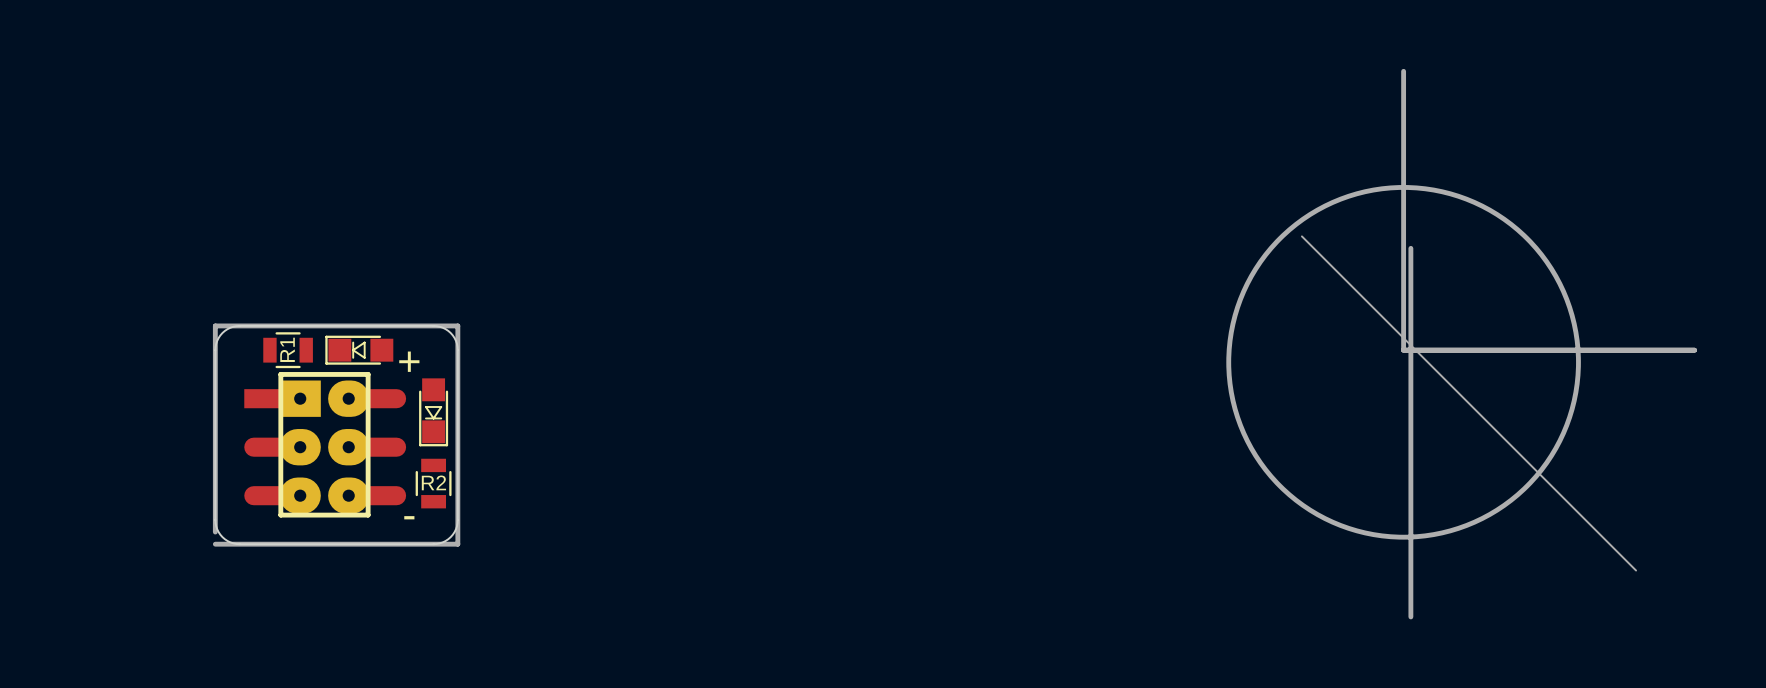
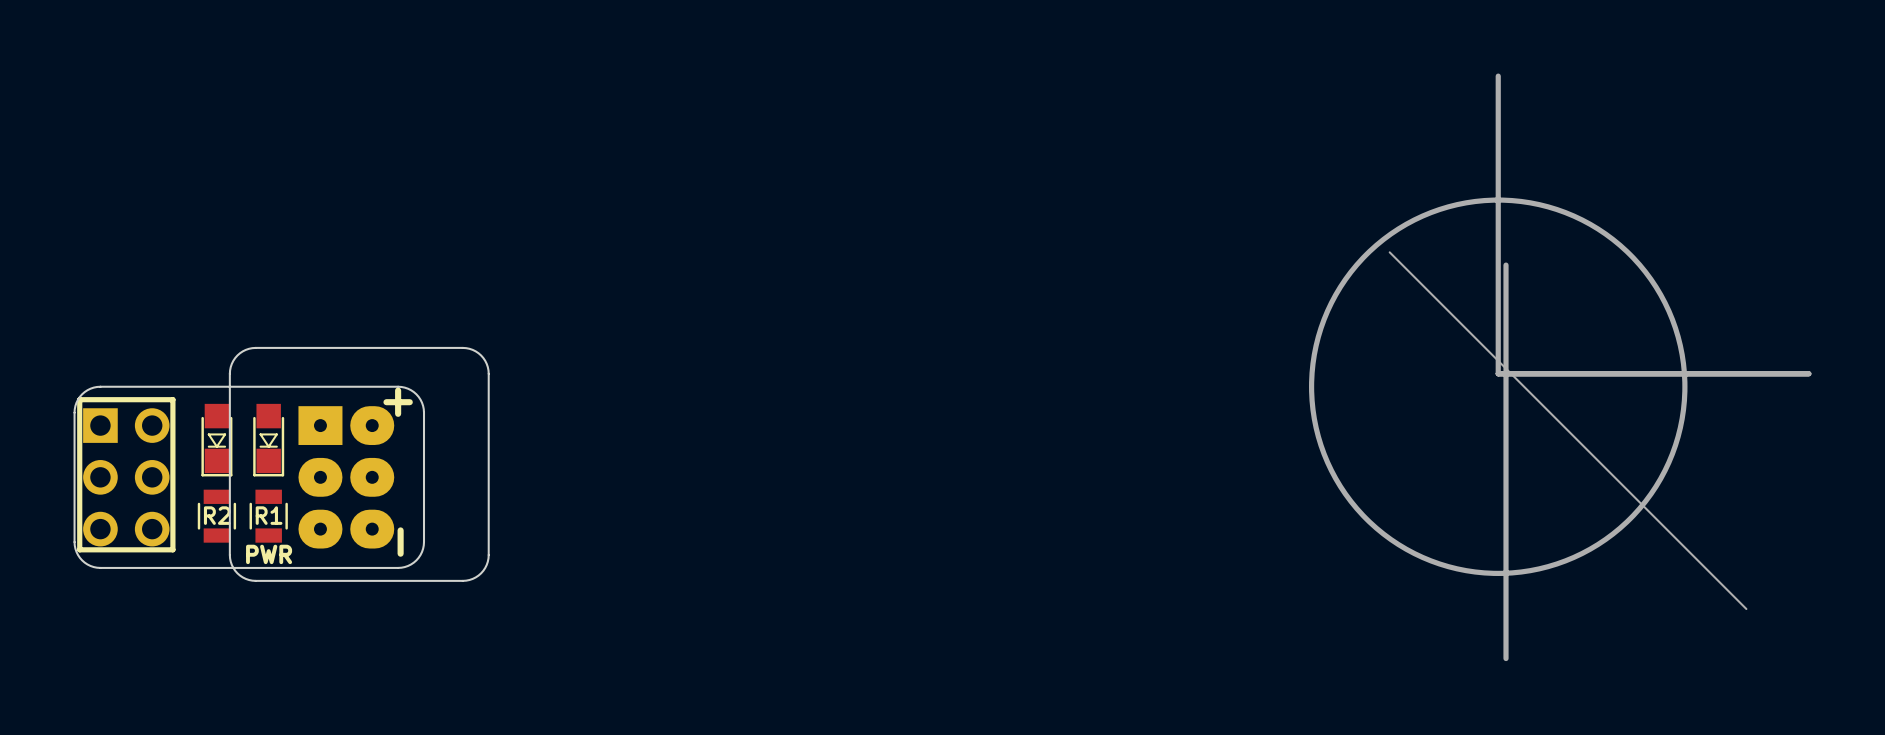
R1 rotation: 0° (288, 350) -> 90° clockwise (268, 516)
R1 position: (288, 350) -> (268, 516)
part: (359, 350) -> none
text position: + (409, 361) -> + (398, 402)
part: none -> (216, 440)
part: none -> (268, 440)
part: (433, 412) -> none
part: none -> (126, 474)
part: (325, 444) -> none
R2 position: (433, 483) -> (216, 516)
board edge: none -> (74, 542) (74, 409) (79, 396) (90, 388) (100, 386) (401, 386) (416, 394) (423, 409) (424, 542) (422, 551) (416, 560) (408, 565) (398, 567)
board edge: none -> (74, 542) (76, 551) (82, 560) (97, 567) (398, 567)
text rotation: 0° (409, 517) -> 90° clockwise (400, 542)
text: none -> PWR (269, 554)
line: (215, 532) (215, 325) (457, 325) (457, 544) (215, 544) -> none

